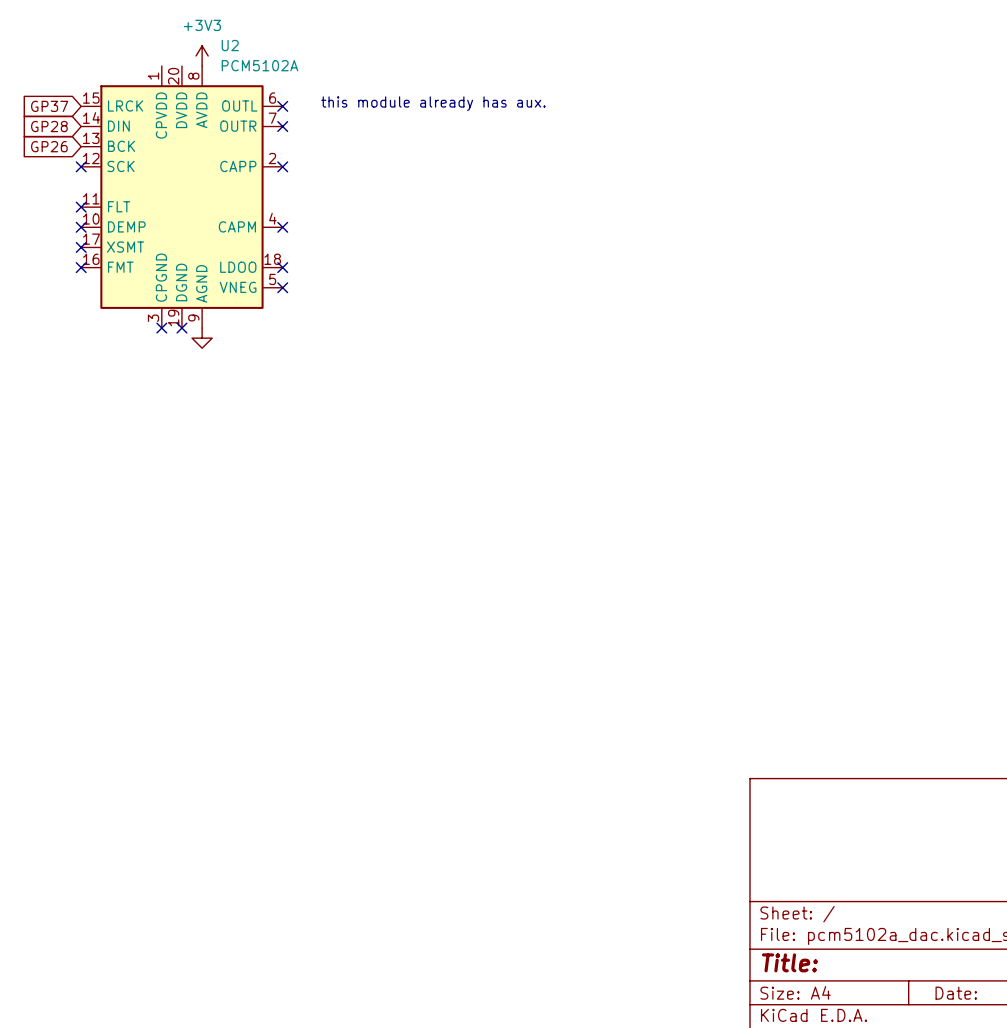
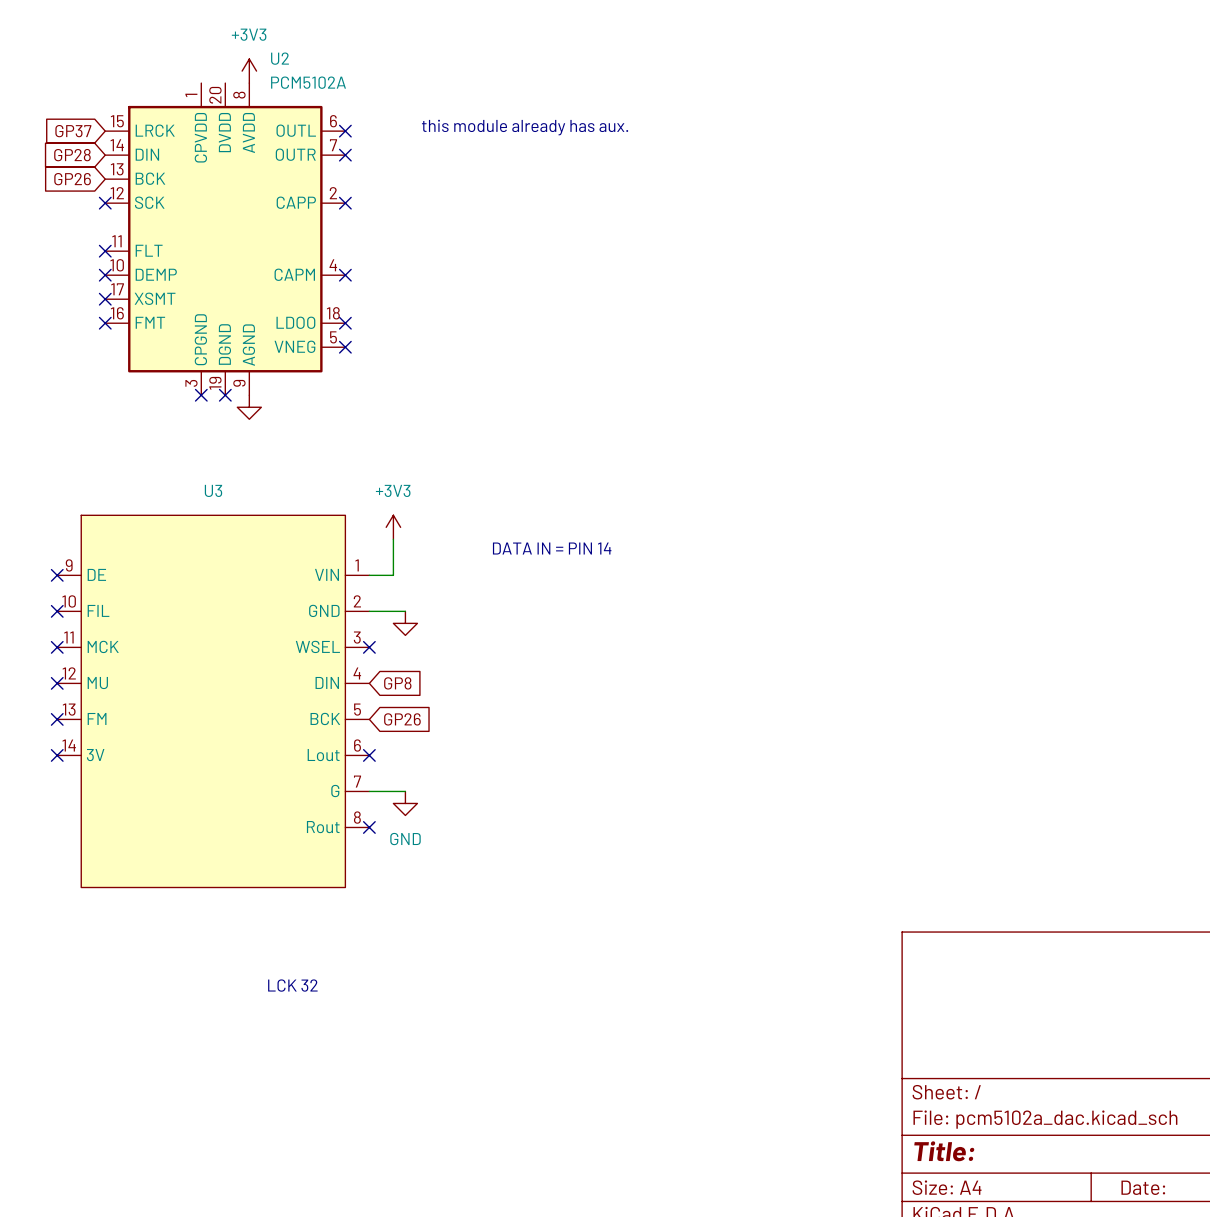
power symbol: none -> +3V3 (393, 527)
wire: none -> (393, 539) (393, 575) (369, 575)
text: none -> DATA IN = PIN 14 (552, 548)
no-connect mark: none -> (57, 575)
no-connect mark: none -> (57, 611)
wire: none -> (369, 611) (405, 611)
power symbol: none -> (405, 623)
no-connect mark: none -> (57, 647)
no-connect mark: none -> (369, 647)
no-connect mark: none -> (57, 683)
global label: none -> GP8 (397, 683)
U3: none -> (213, 701)
no-connect mark: none -> (57, 719)
global label: none -> GP26 (402, 719)
no-connect mark: none -> (57, 755)
no-connect mark: none -> (369, 755)
wire: none -> (369, 791) (405, 791)
power symbol: none -> GND (405, 803)
no-connect mark: none -> (369, 827)
text: none -> LCK 32 (292, 985)

